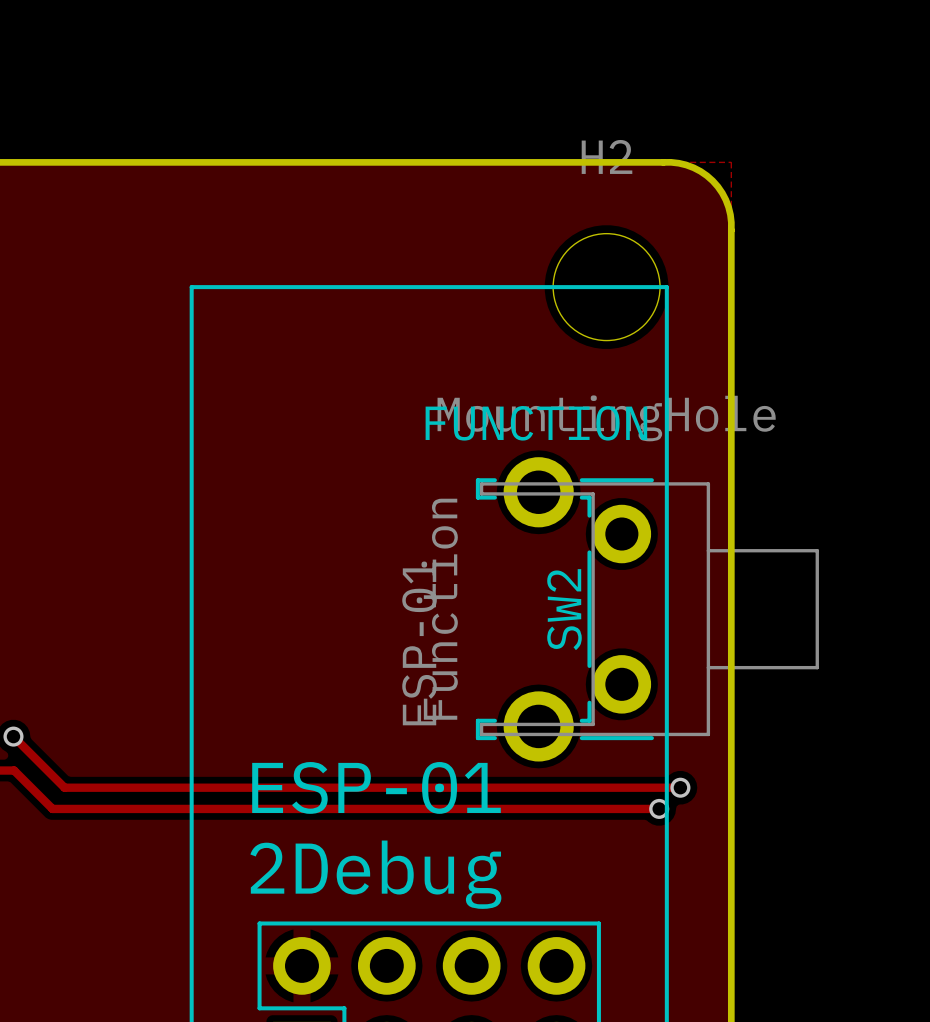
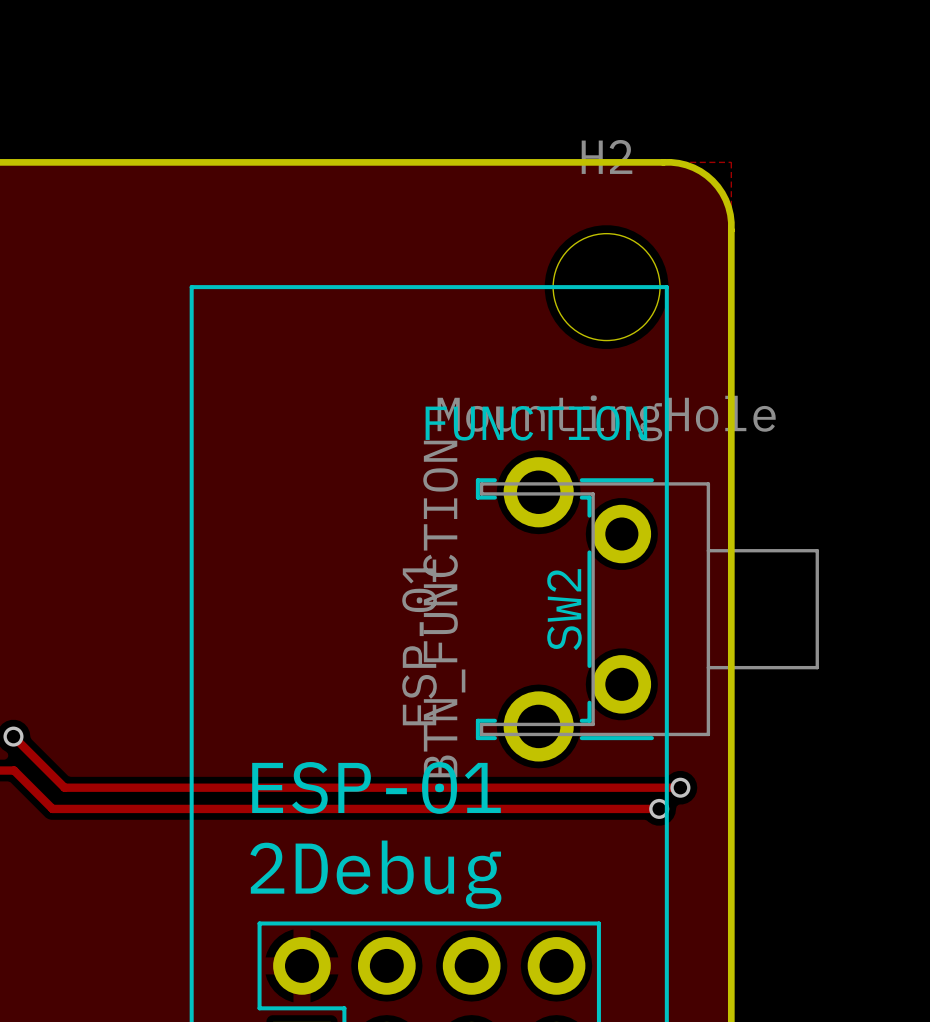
SW2 value: Function (439, 609) -> BTN_FUNCTION (444, 608)

